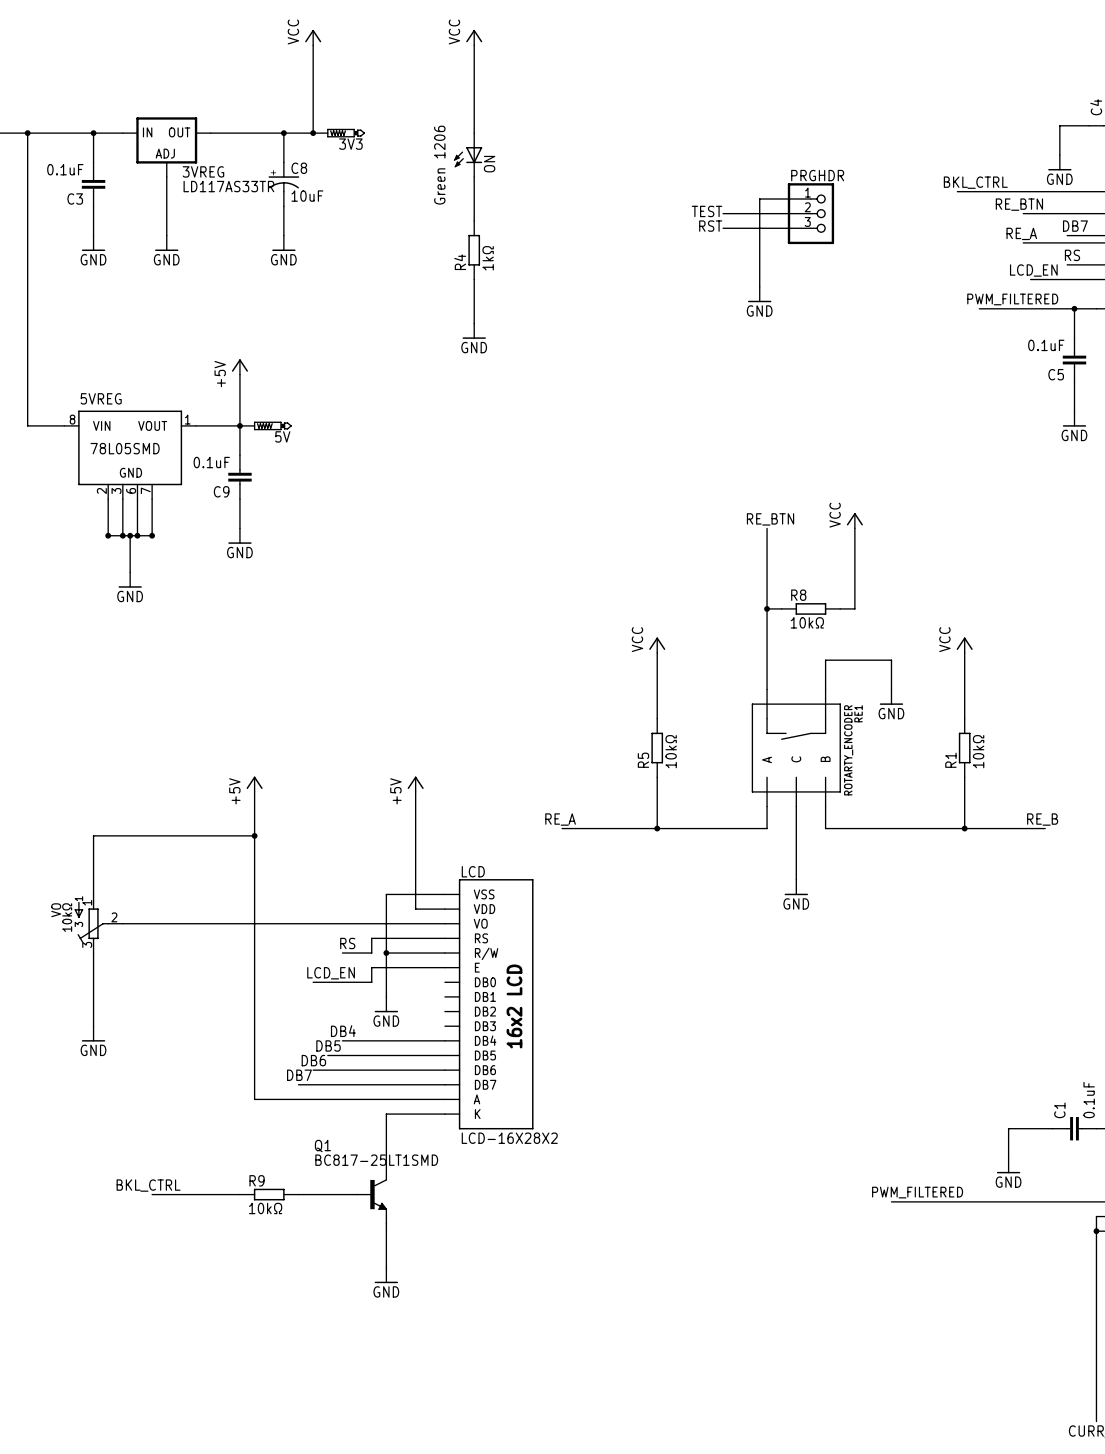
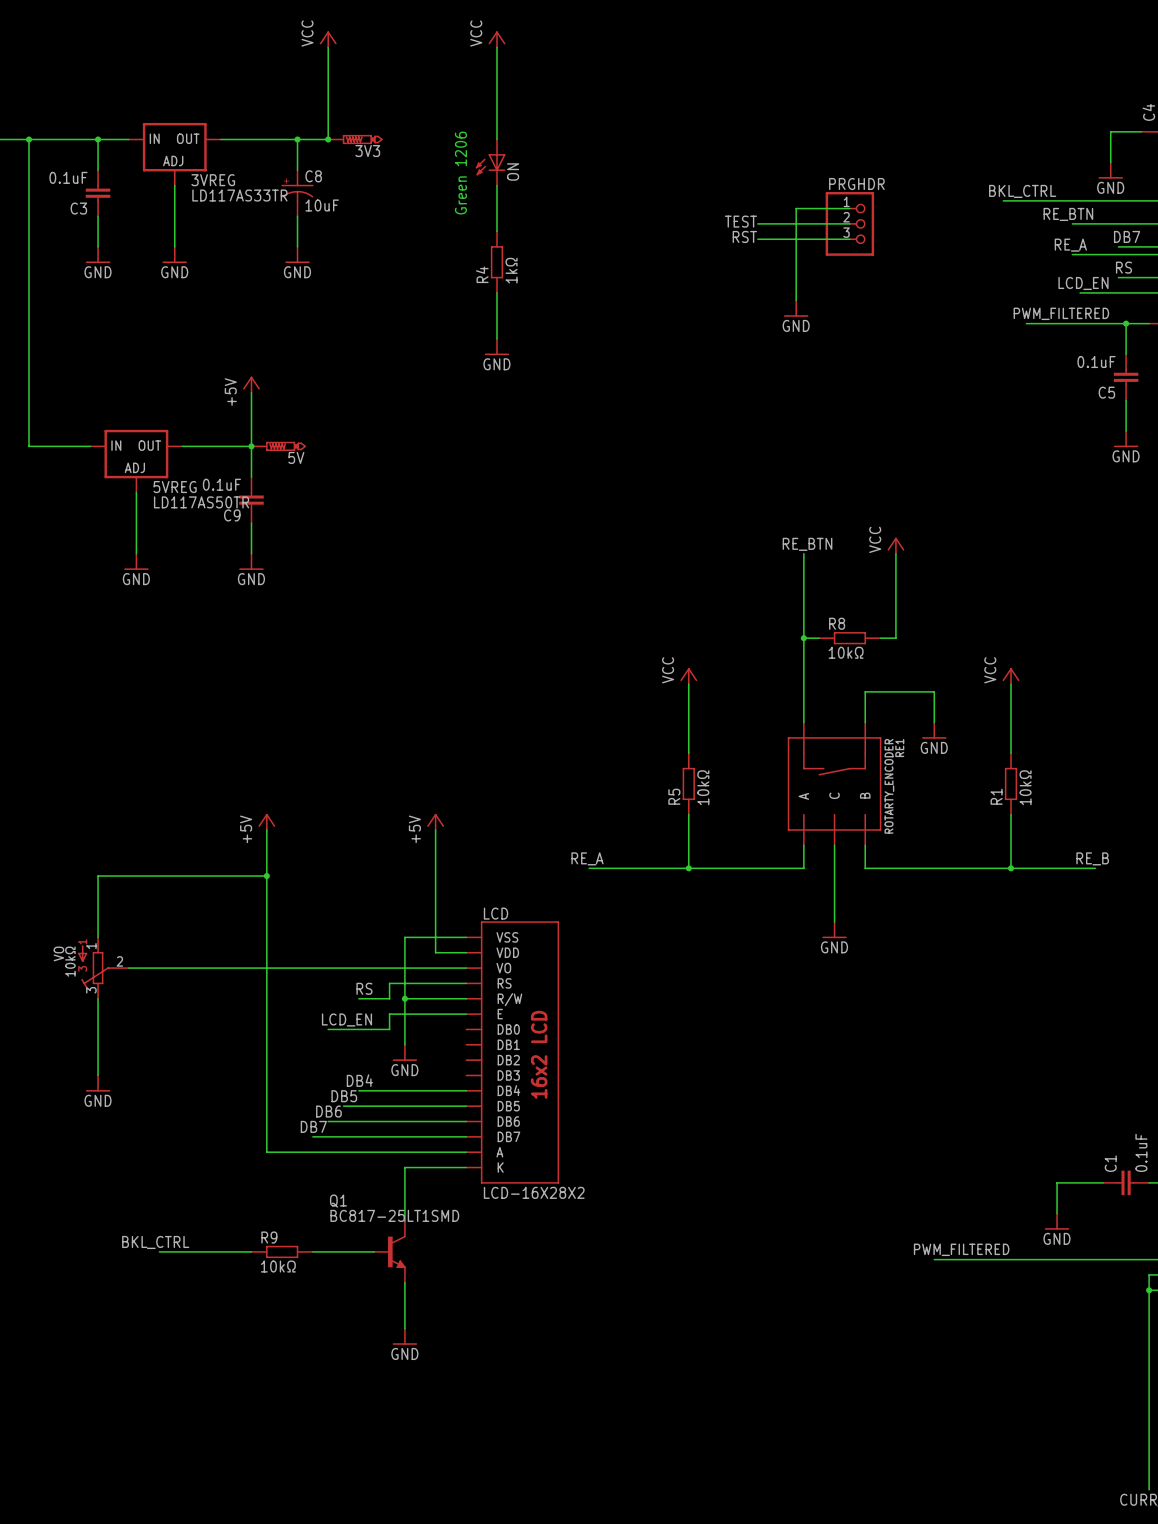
5VREG name position: 5VREG (101, 398) -> 5VREG (175, 487)
5VREG symbol: [64, 410, 197, 500] -> [90, 429, 183, 493]
5VREG value: 78L05SMD (125, 448) -> LD117AS50TR (201, 502)
wire: none -> (136, 492) (136, 553)
wire: (108, 499) (108, 535) (152, 535) (152, 499) -> none
wire: (122, 499) (122, 535) -> none
wire: (137, 499) (137, 535) -> none
junction: (108, 535) -> none
junction: (122, 535) -> none
wire: (130, 535) (130, 572) -> none
junction: (130, 535) -> none
junction: (137, 535) -> none
junction: (152, 535) -> none
power symbol position: GND (130, 580) -> GND (136, 561)

